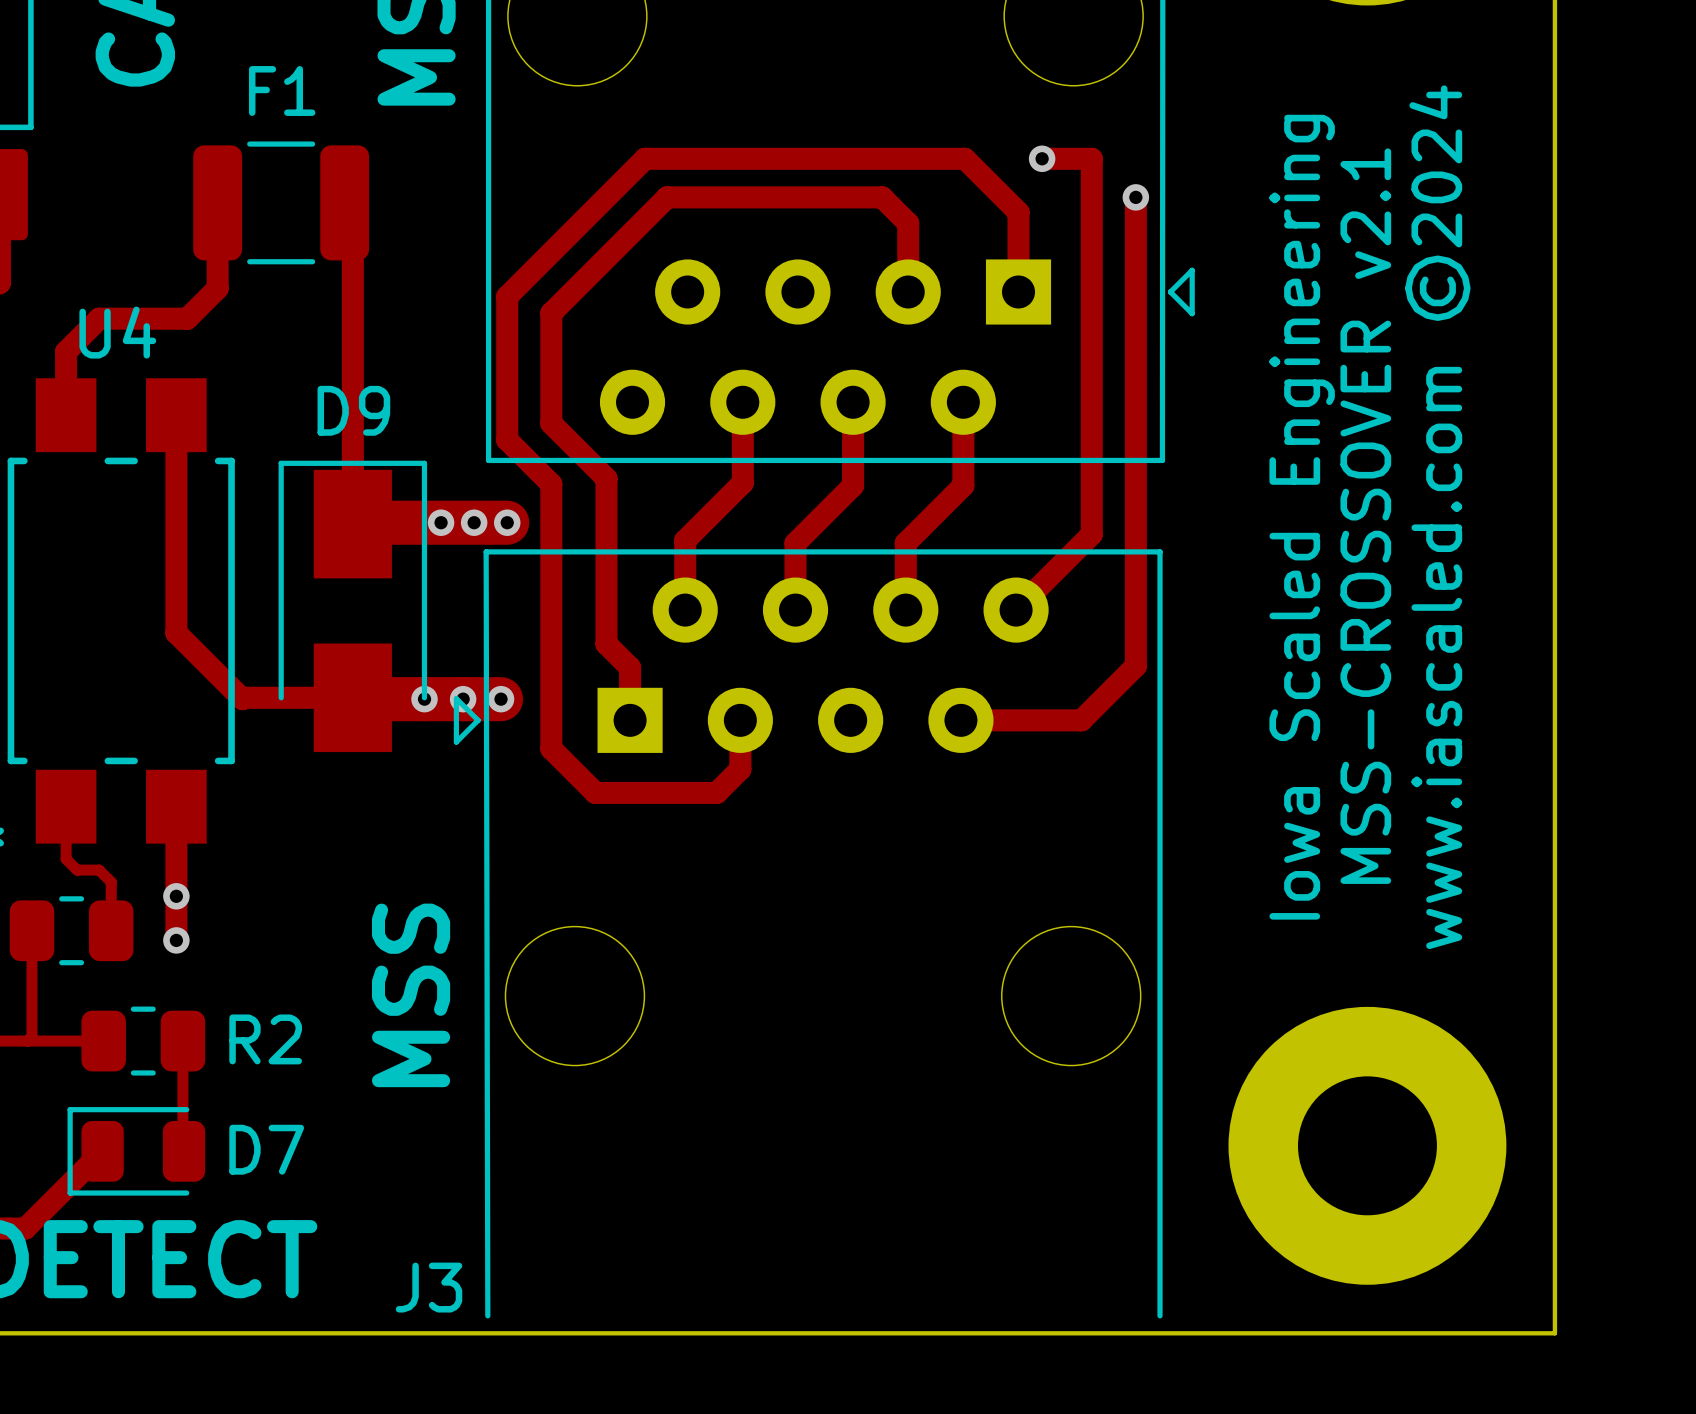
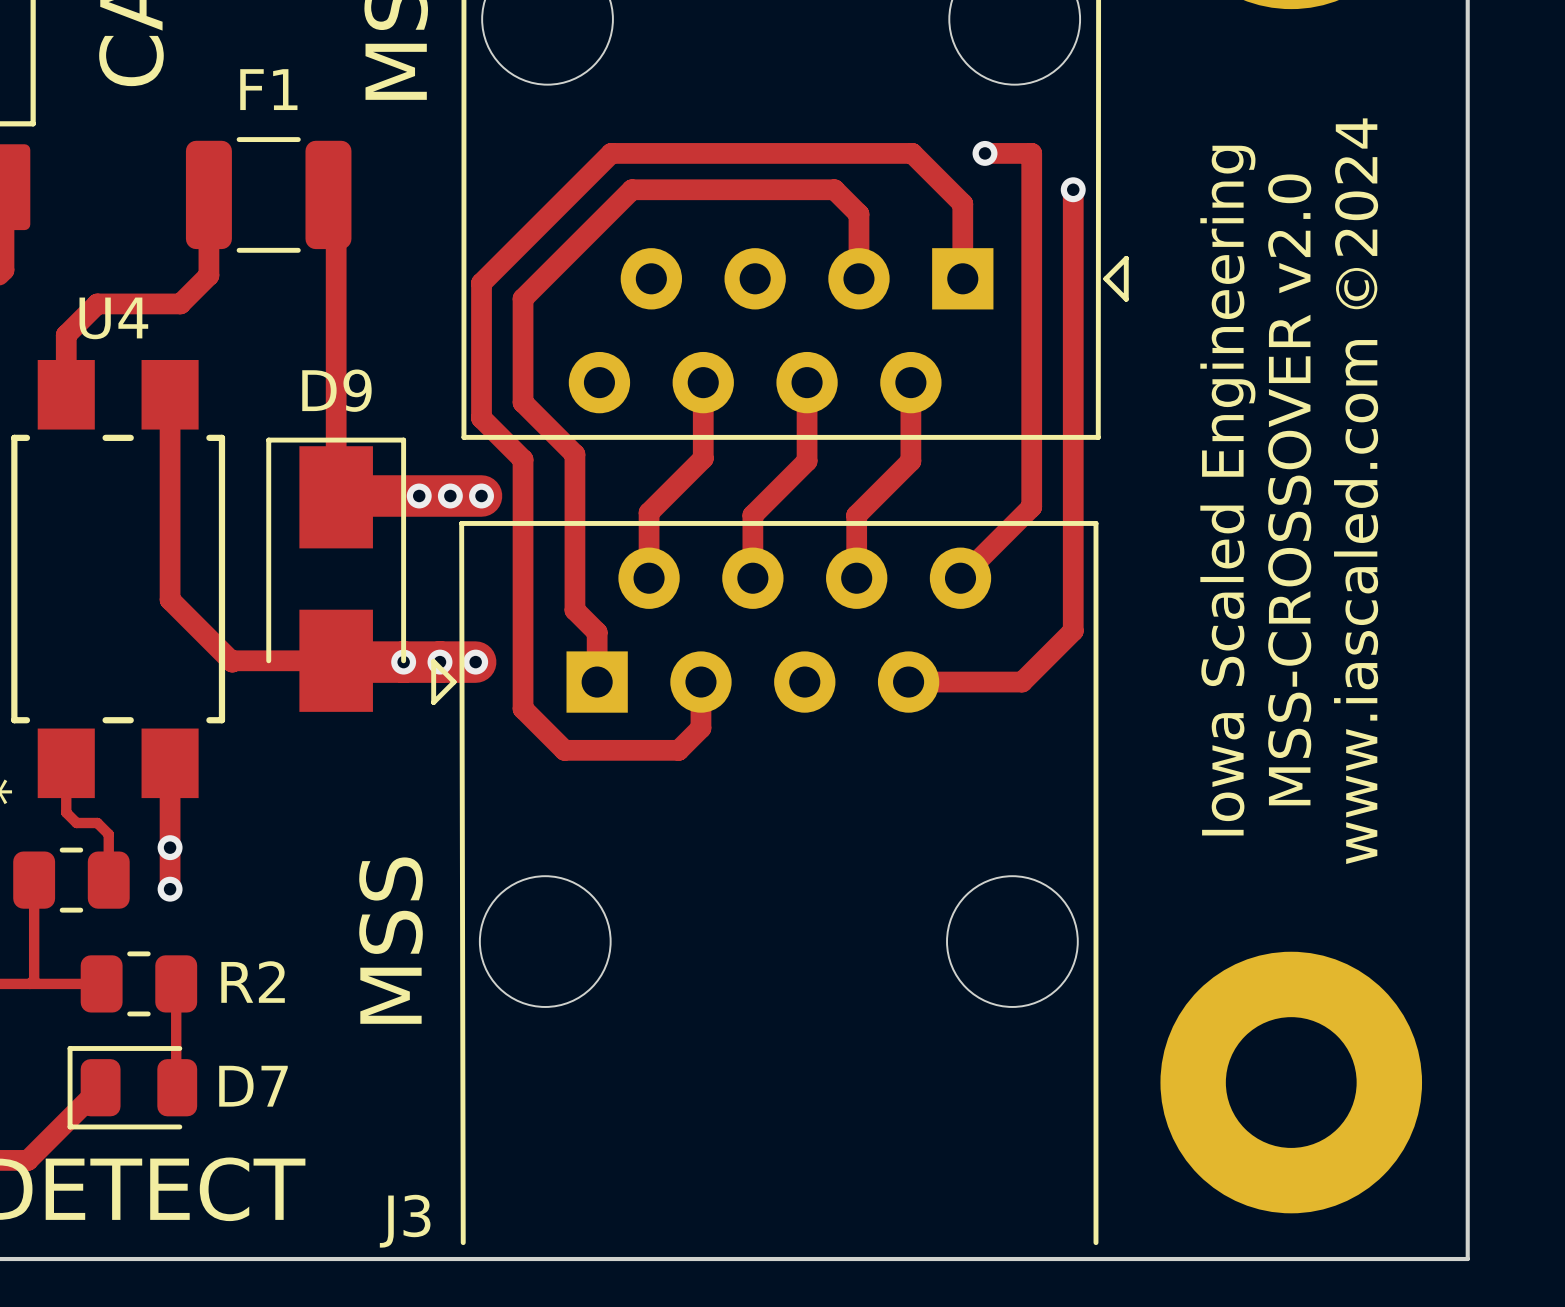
text: MSS-CROSSOVER v2.1 (1365, 516) -> MSS-CROSSOVER v2.0 (1289, 489)

